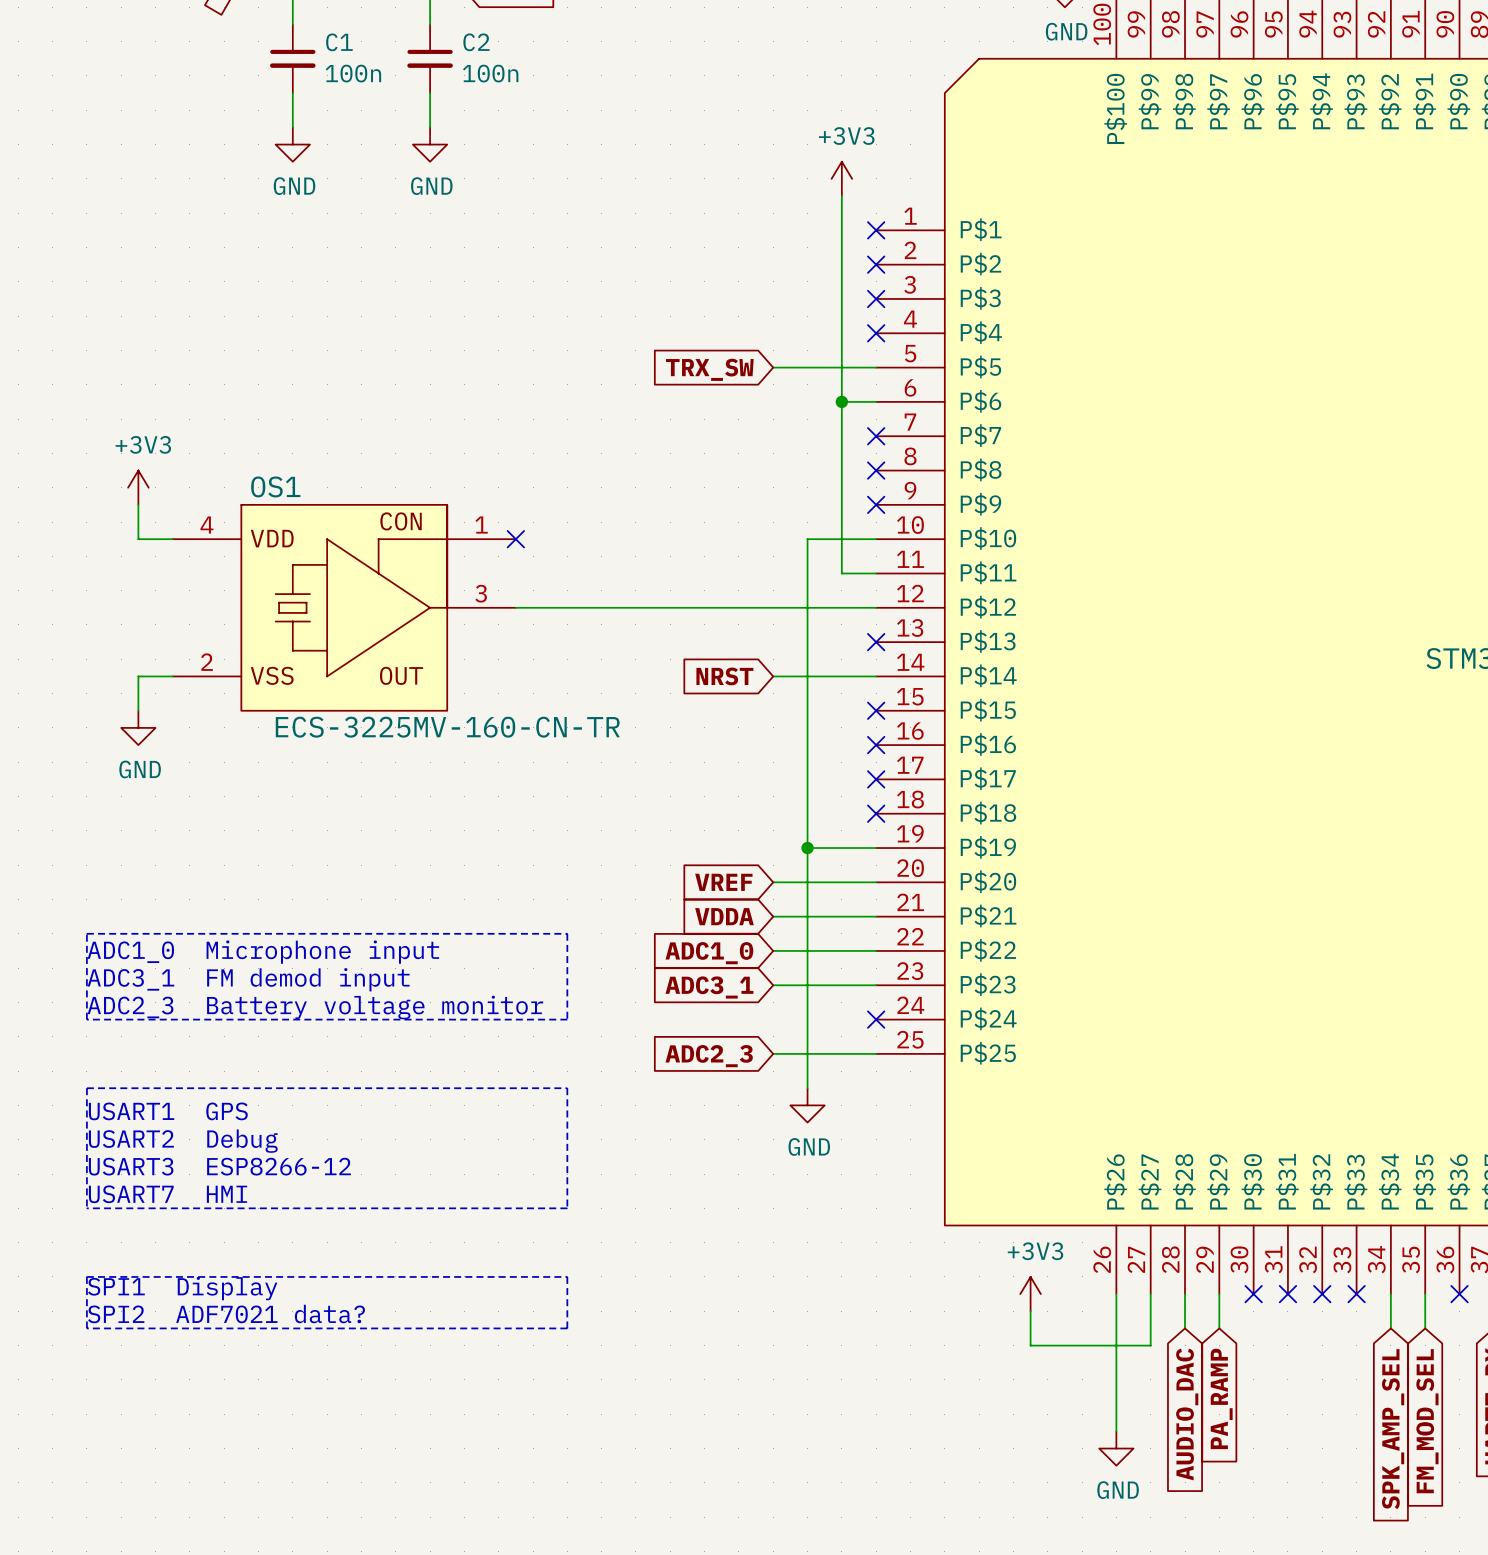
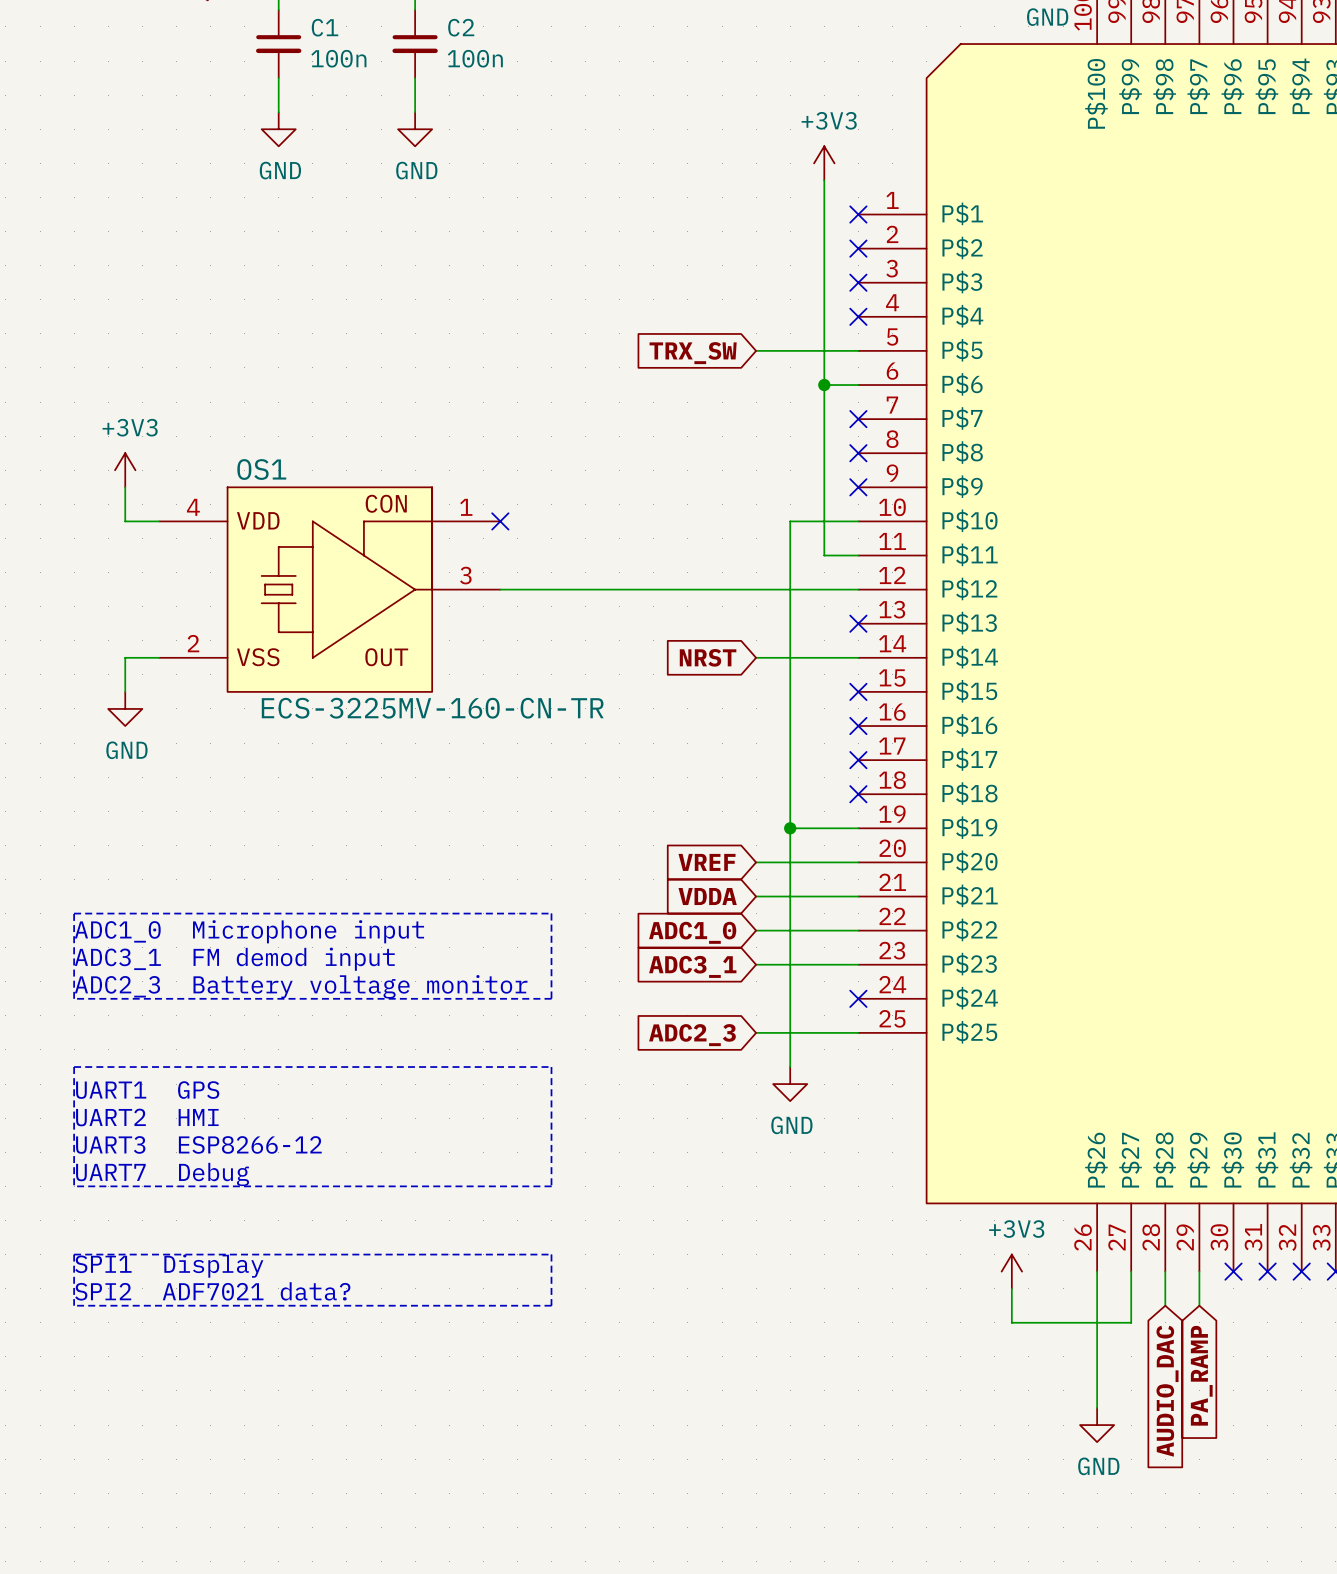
text: USART1 GPS (168, 1111) -> UART1 GPS (147, 1090)
text: USART2 Debug (183, 1141) -> UART2 HMI (147, 1117)
text: USART3 ESP8266-12 (219, 1166) -> UART3 ESP8266-12 (198, 1144)
text: USART7 HMI (167, 1194) -> UART7 Debug (162, 1174)

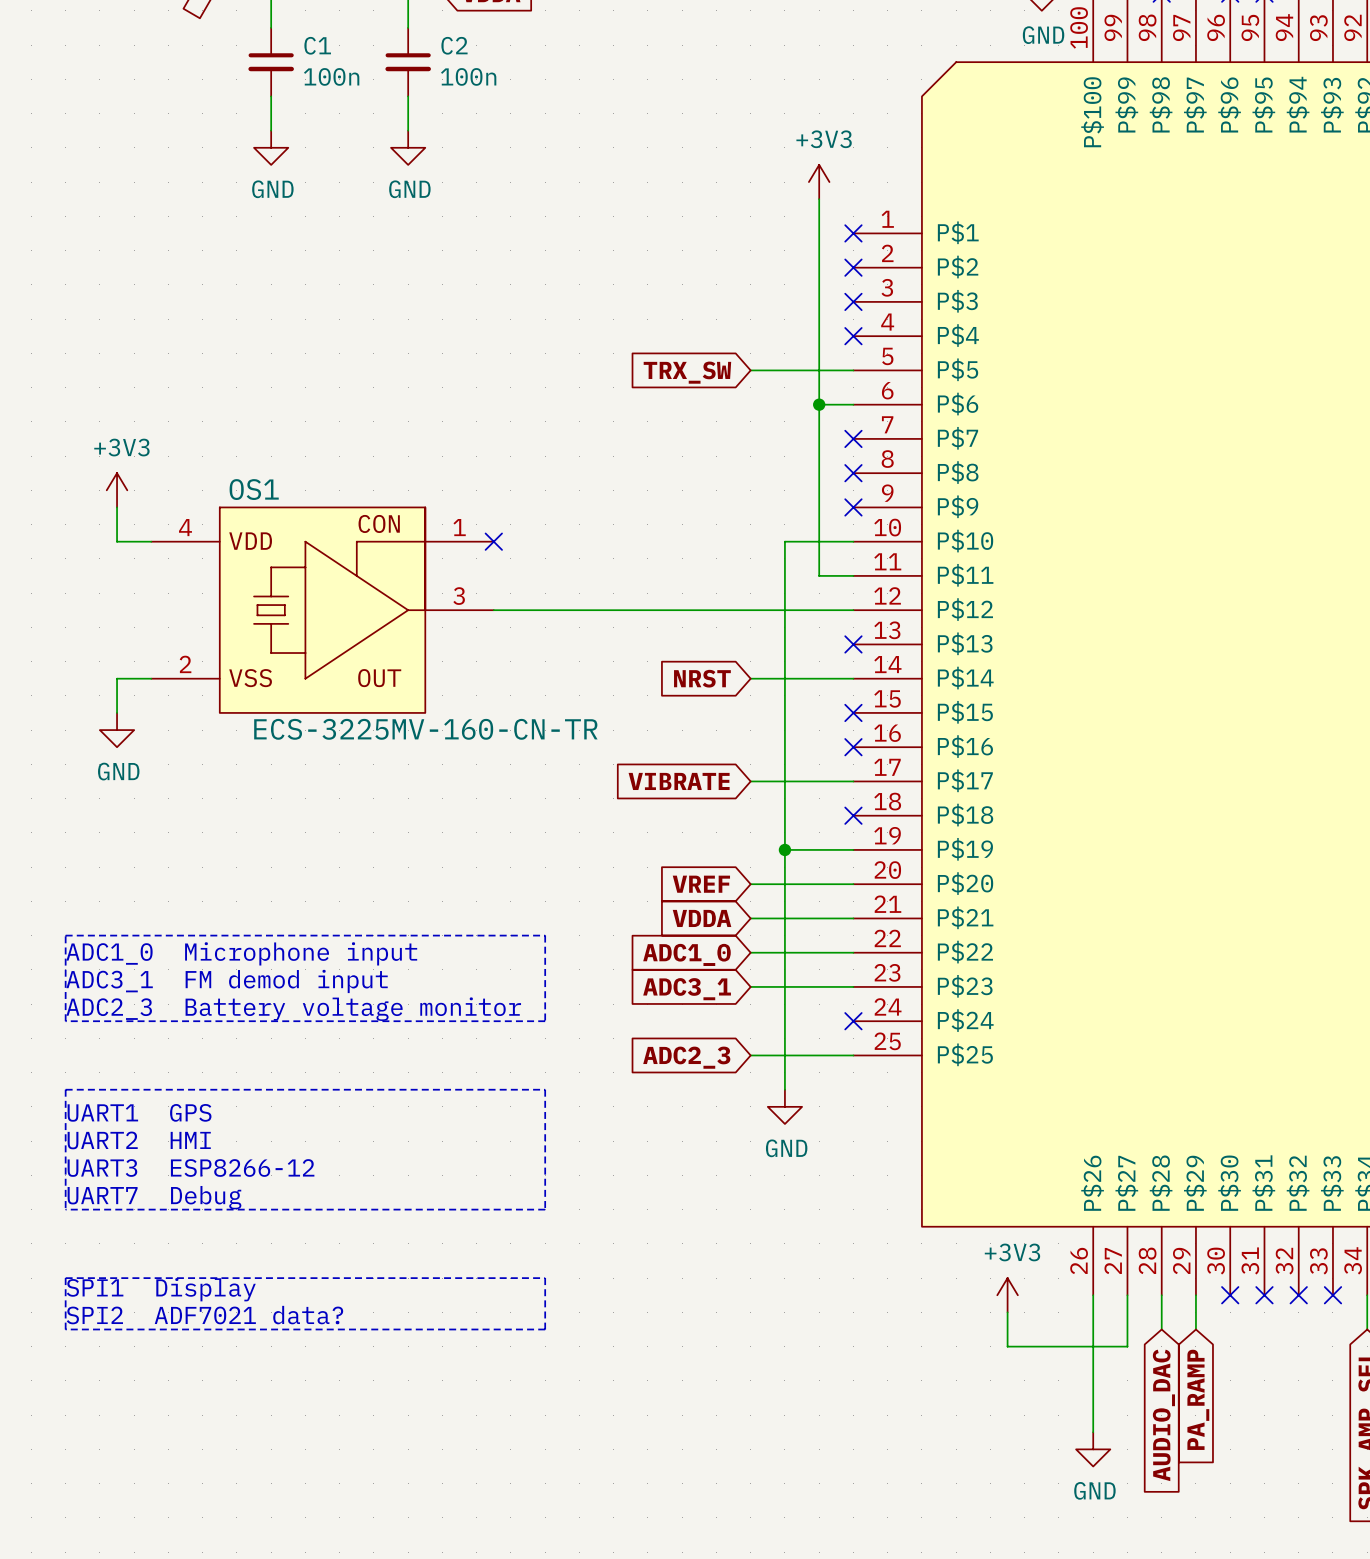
global label: none -> VIBRATE (679, 781)
wire: none -> (750, 781) (853, 781)
no-connect mark: (858, 760) -> none

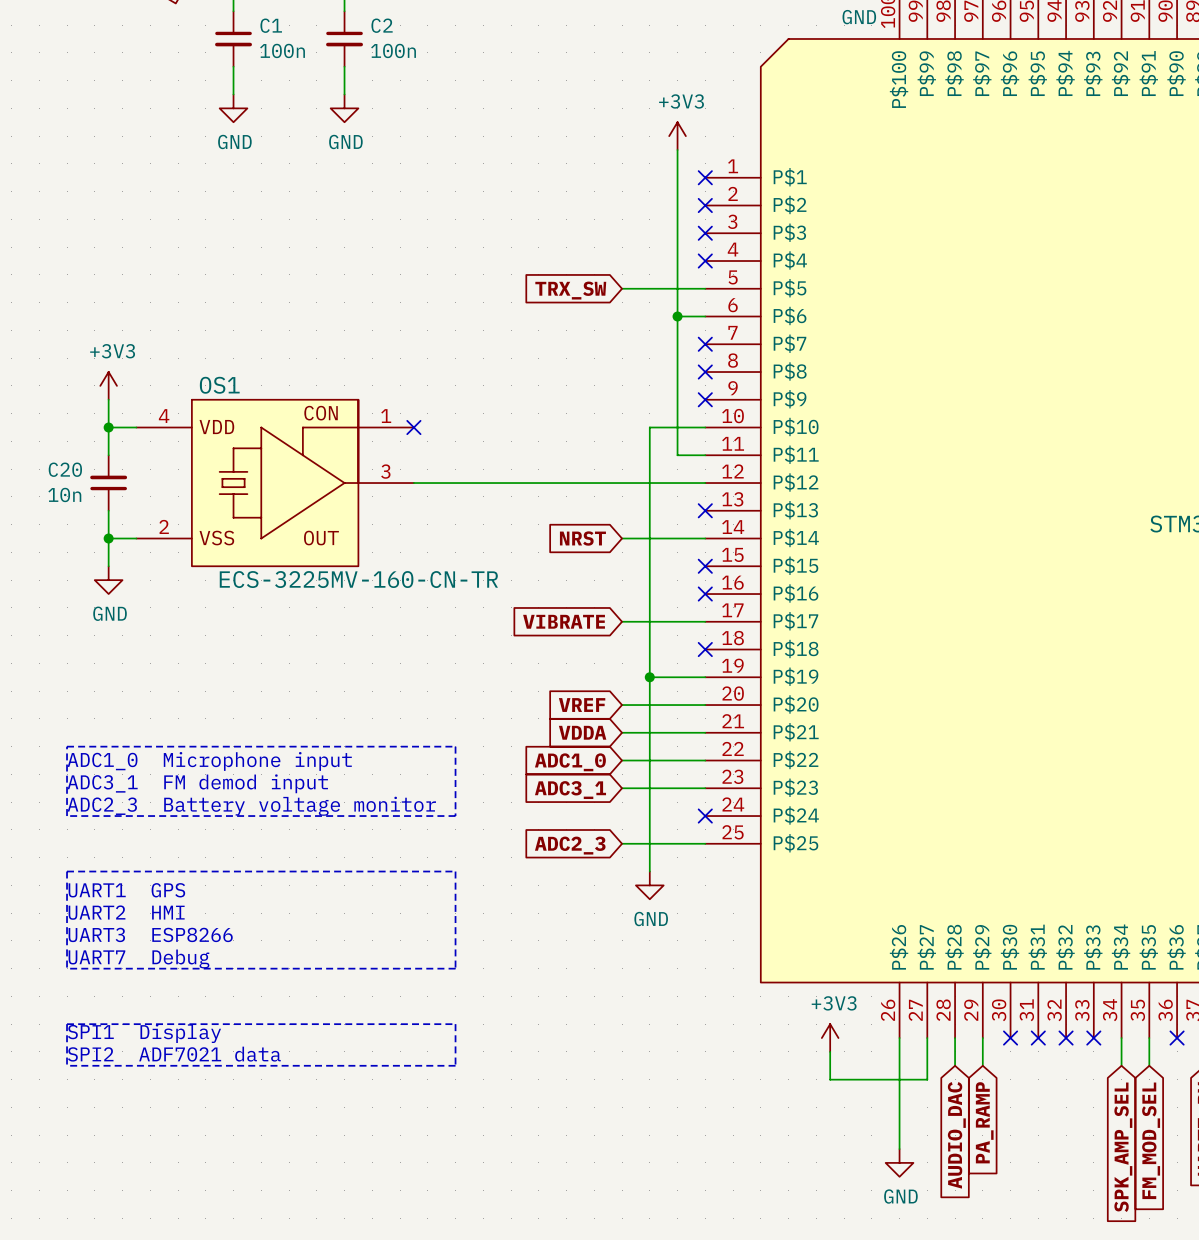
wire: none -> (108, 427) (108, 455)
junction: none -> (108, 427)
C20: none -> 10n (108, 483)
wire: none -> (108, 510) (108, 538)
junction: none -> (108, 538)
text: UART3 ESP8266-12 (191, 1168) -> UART3 ESP8266 (150, 934)
text: SPI2 ADF7021 data? (204, 1315) -> SPI2 ADF7021 data (174, 1054)

